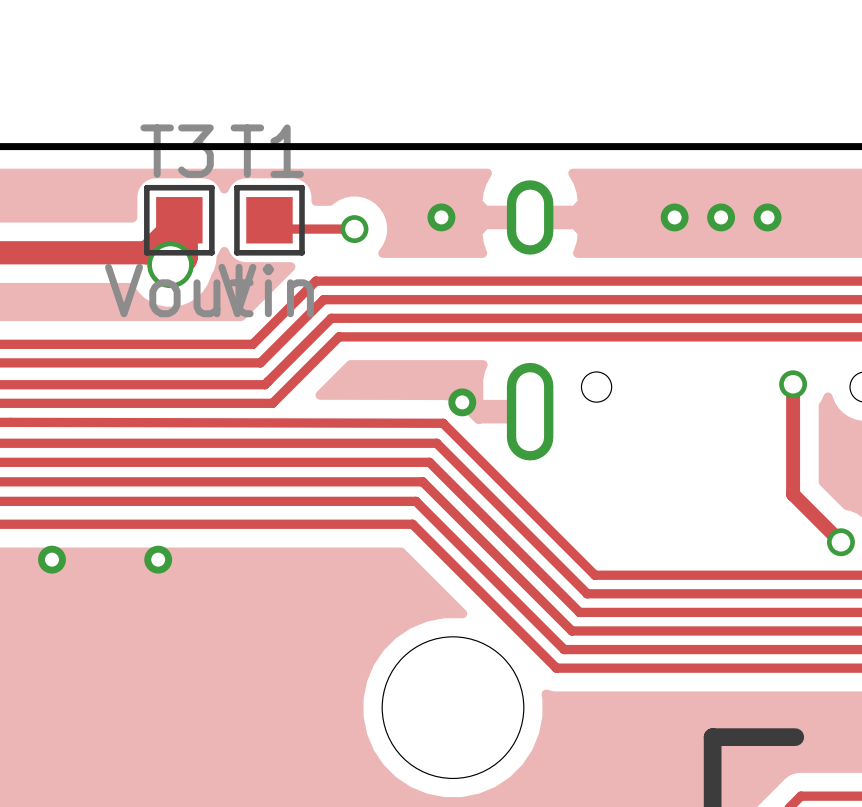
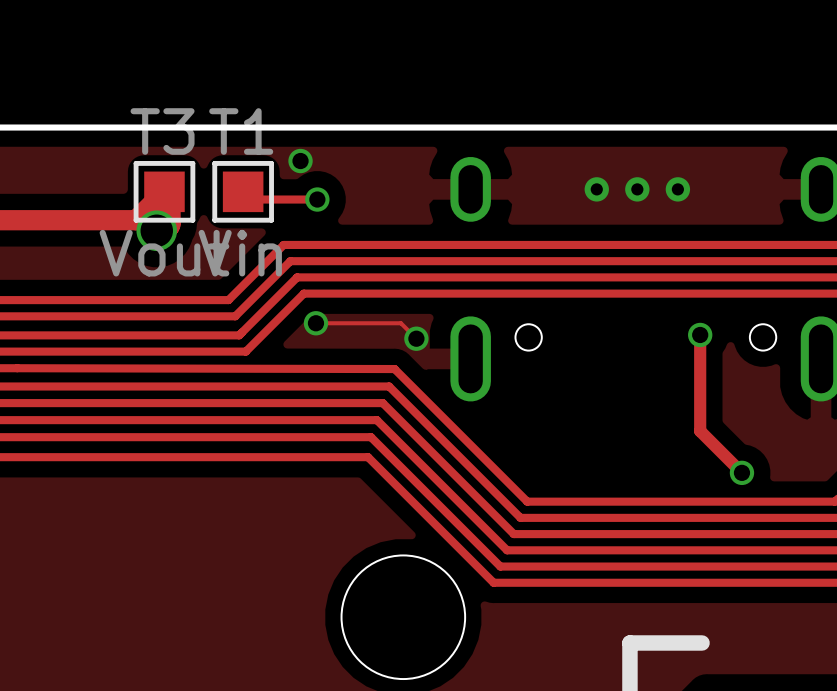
via: none -> (300, 161)
part: (441, 217) -> none
track: none -> (315, 323) (400, 323) (416, 338)
via: none -> (315, 323)
via: none -> (416, 338)
part: (462, 402) -> none
part: (51, 559) -> none
part: (158, 559) -> none

